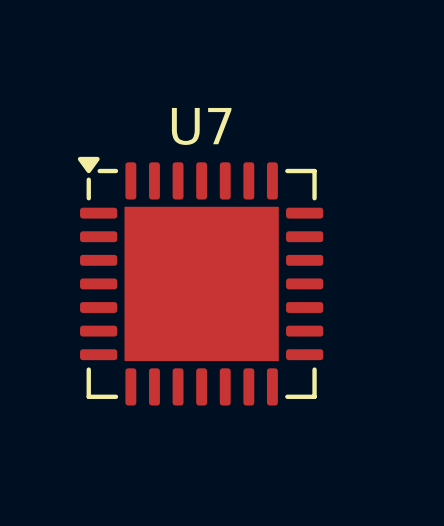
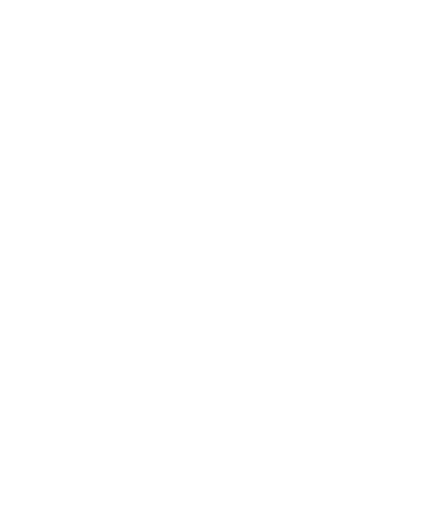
U7: (200, 281) -> none

